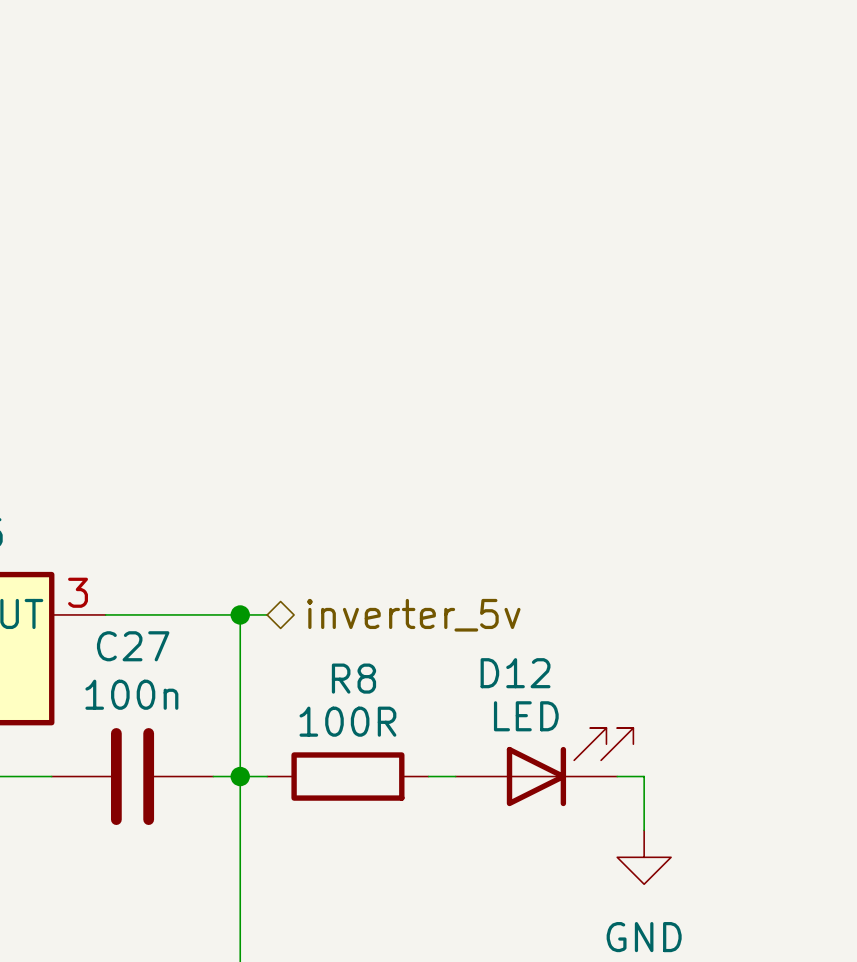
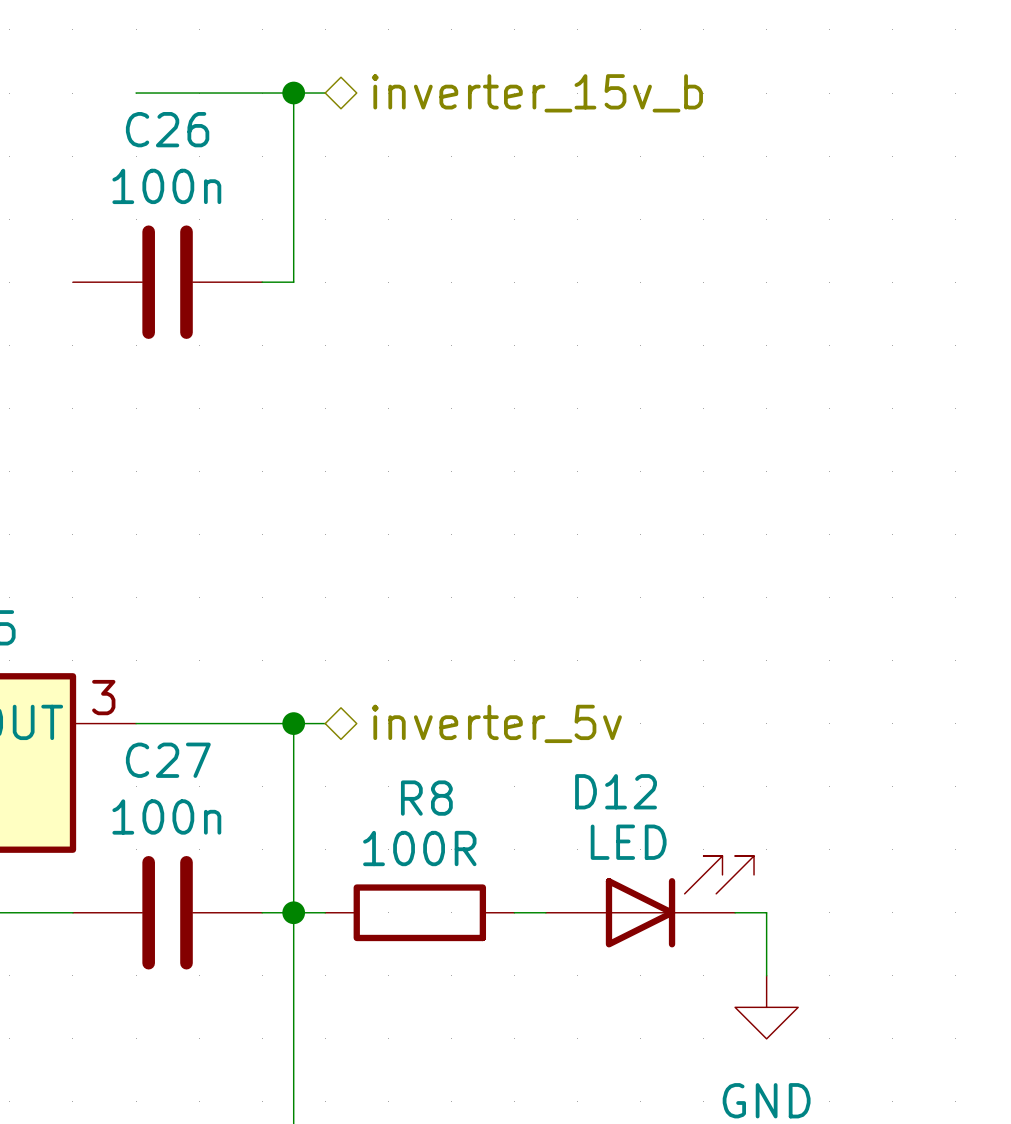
wire: none -> (136, 93) (325, 93)
wire: none -> (293, 93) (293, 282) (262, 282)
junction: none -> (293, 93)
hierarchical label: none -> inverter_15v_b (537, 93)
C26: none -> 100n (167, 282)

